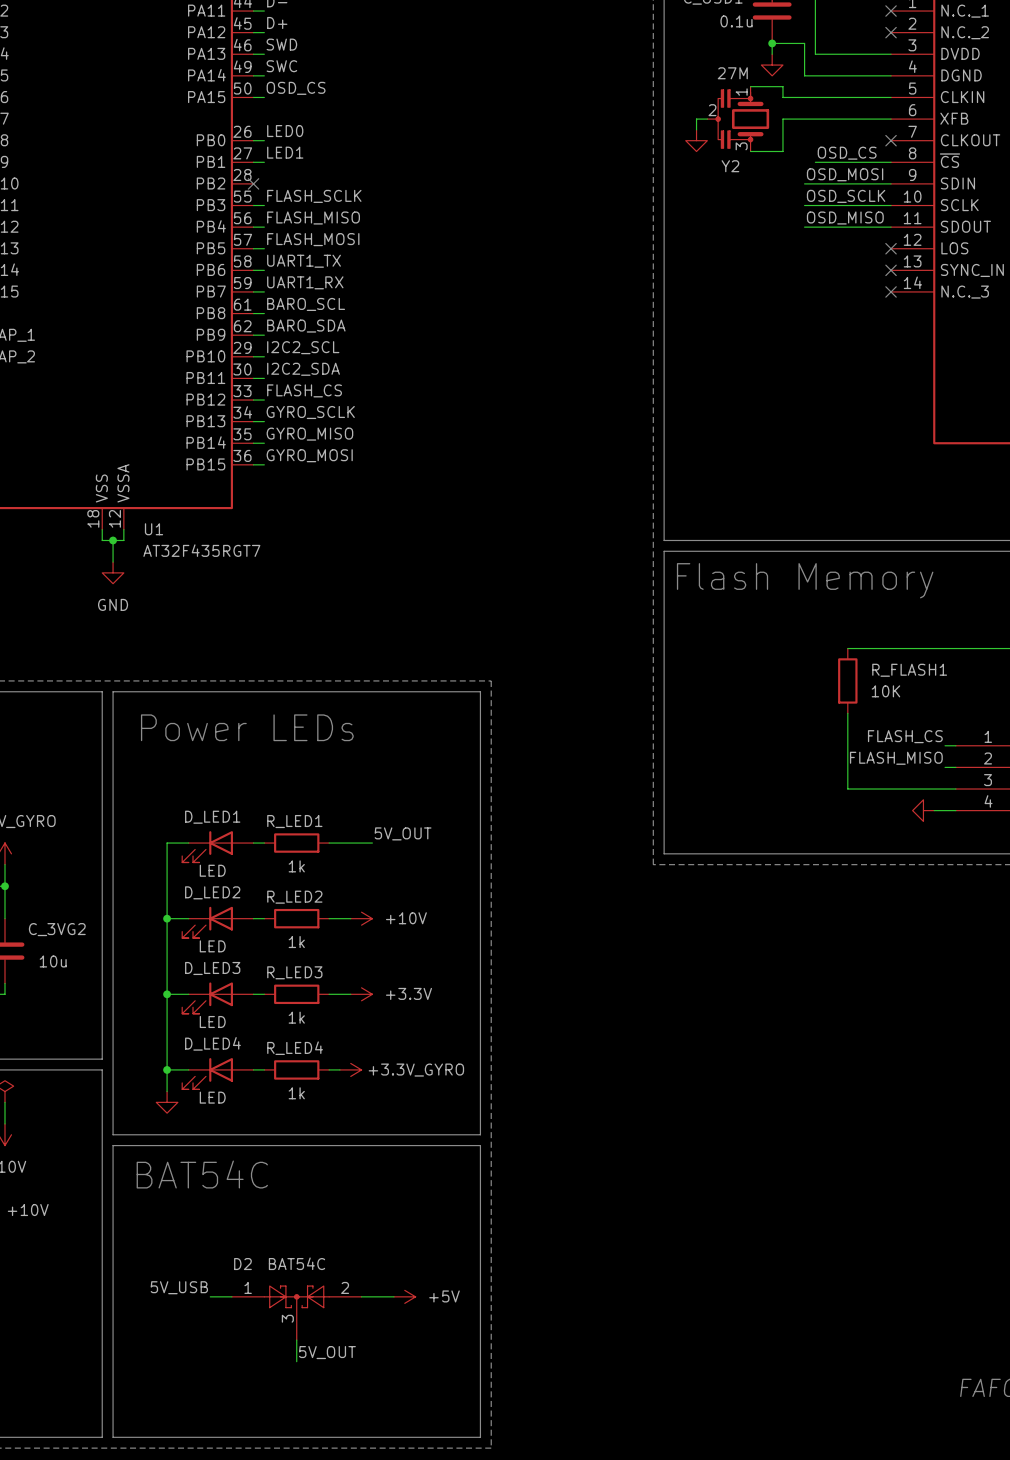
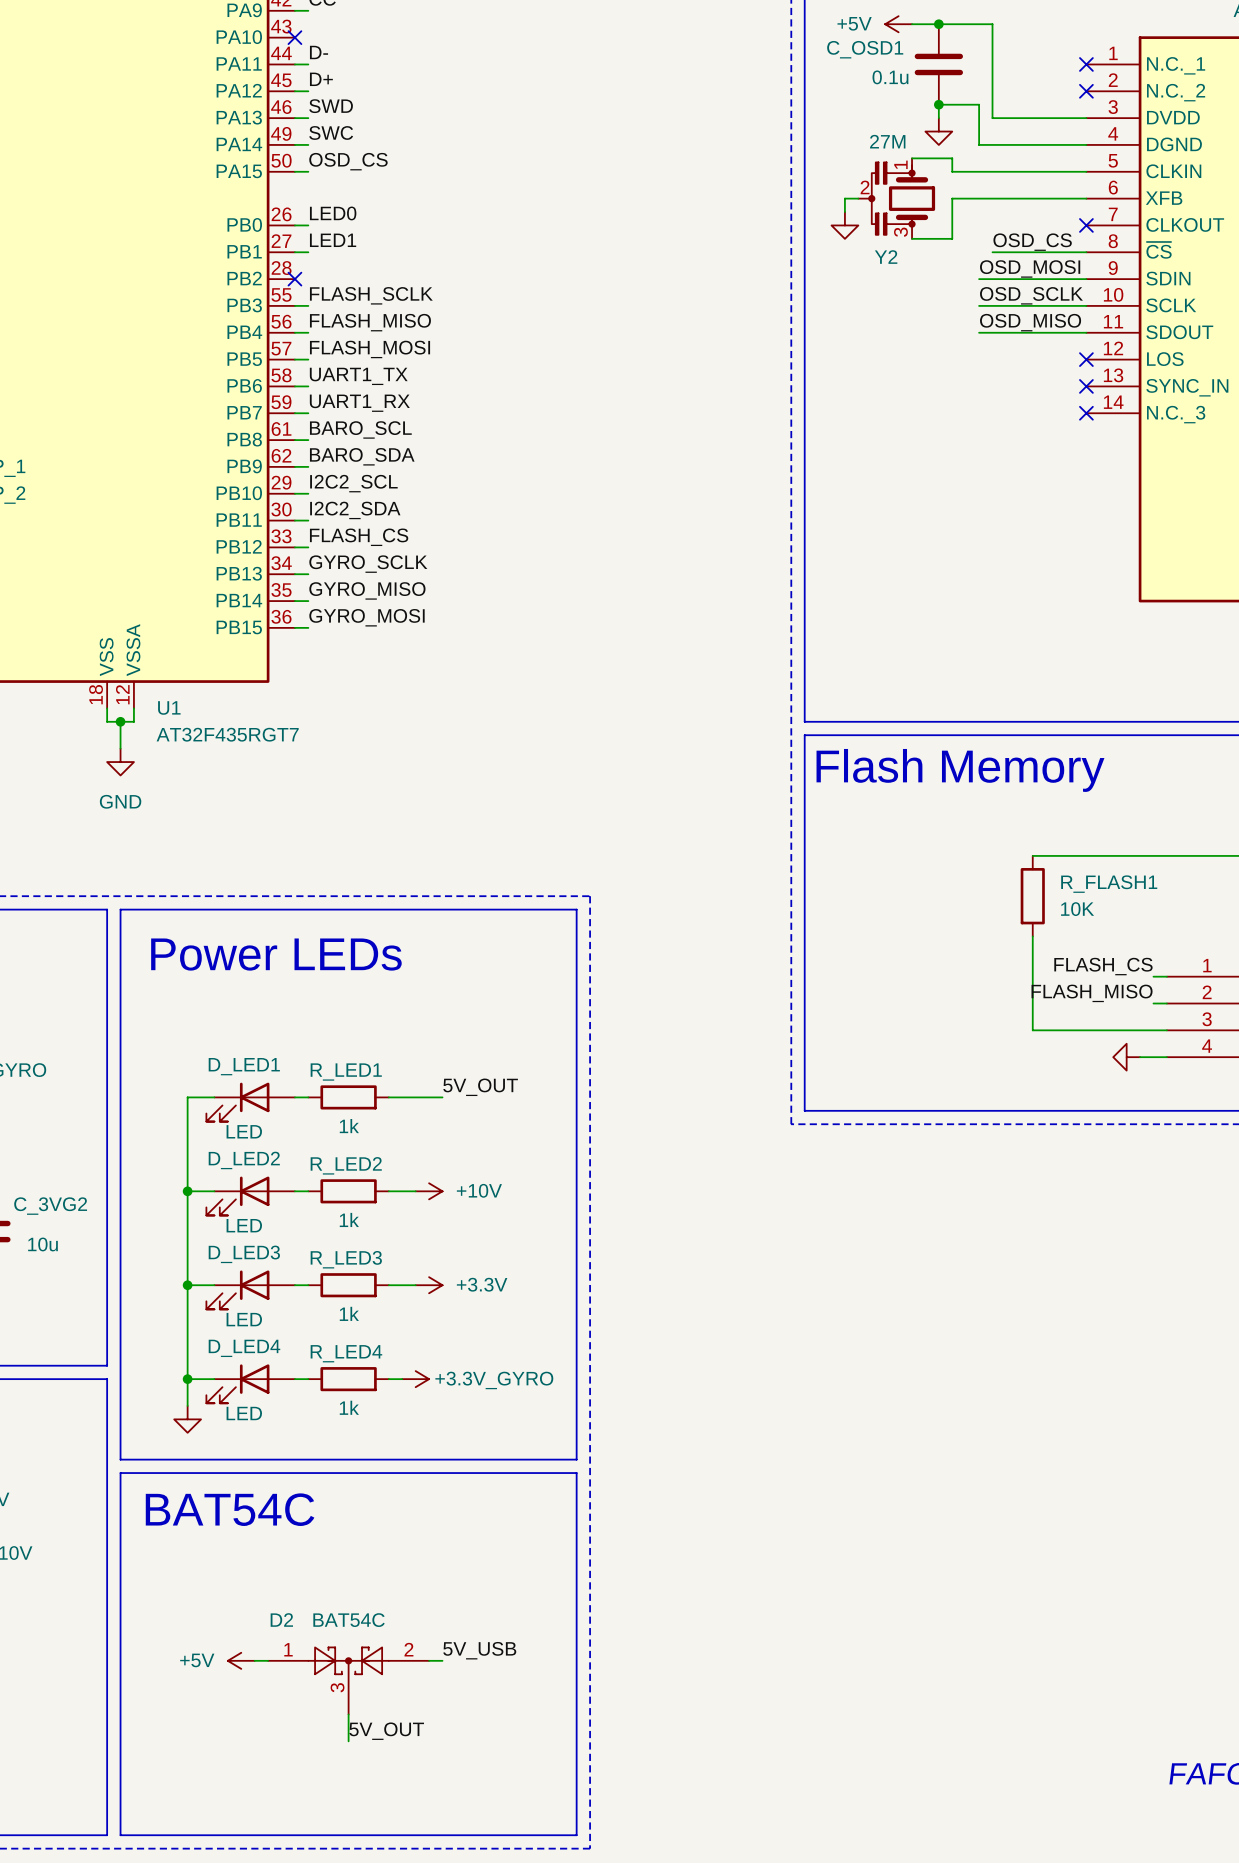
label position: 5V_USB (179, 1287) -> 5V_USB (479, 1650)
wire: (372, 1296) (393, 1296) -> none
power symbol rotation: 0° (404, 1296) -> 180° (241, 1660)
power symbol position: +5V (404, 1296) -> +5V (241, 1660)

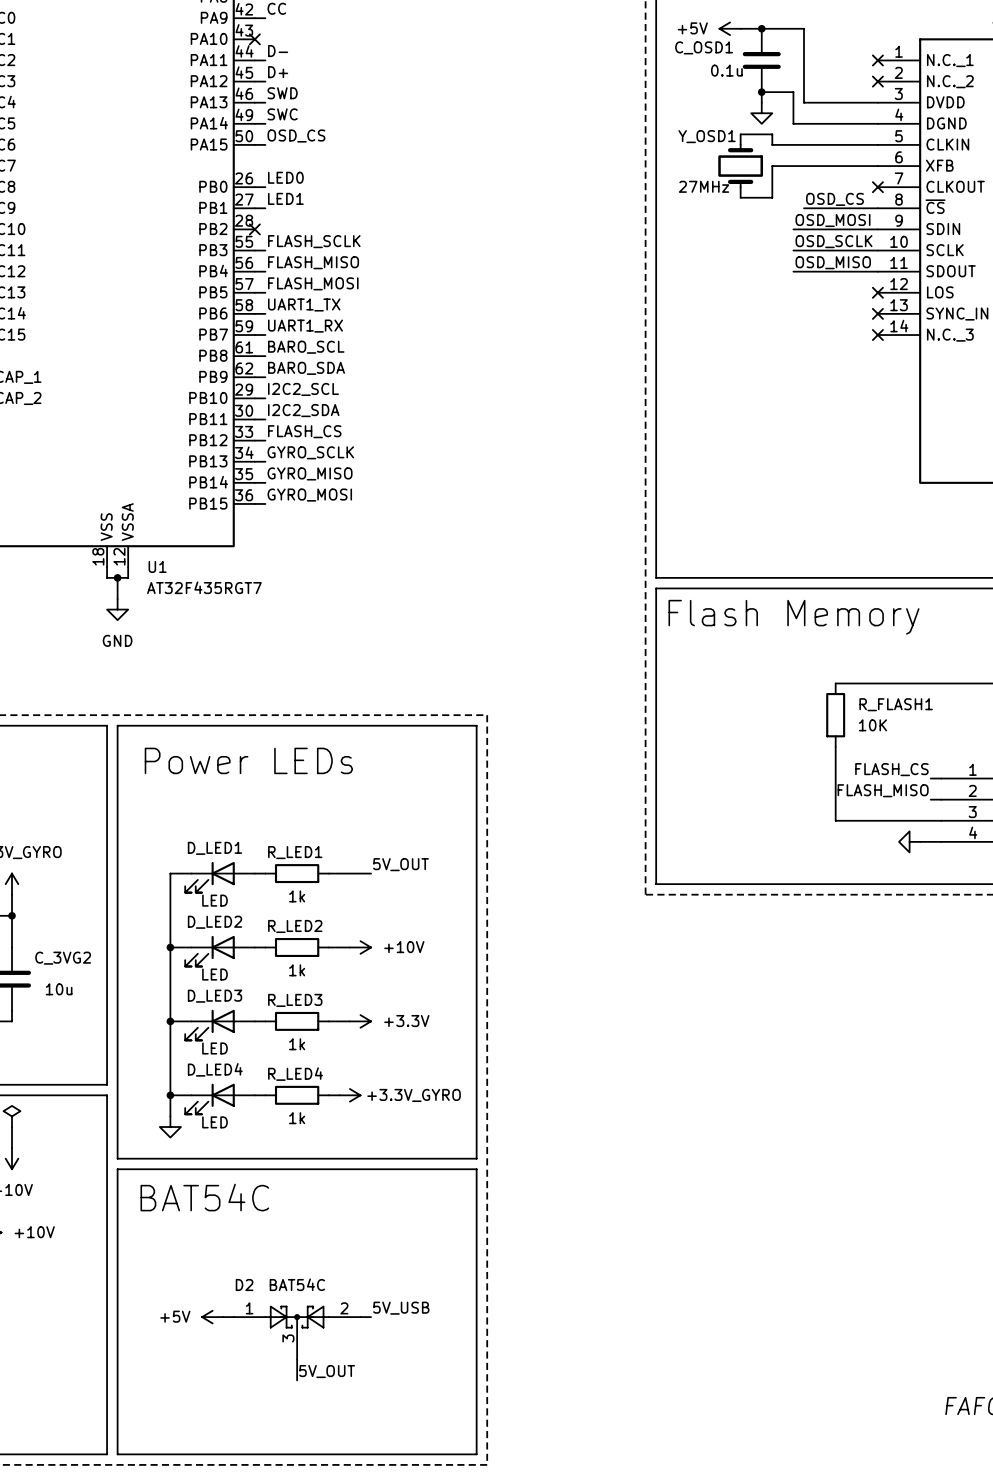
wire: (858, 198) (844, 198) (844, 212) -> none
Y2: 27M (896, 198) -> none
Y_OSD1: none -> 27MHz (740, 166)
power symbol: (844, 225) -> none

